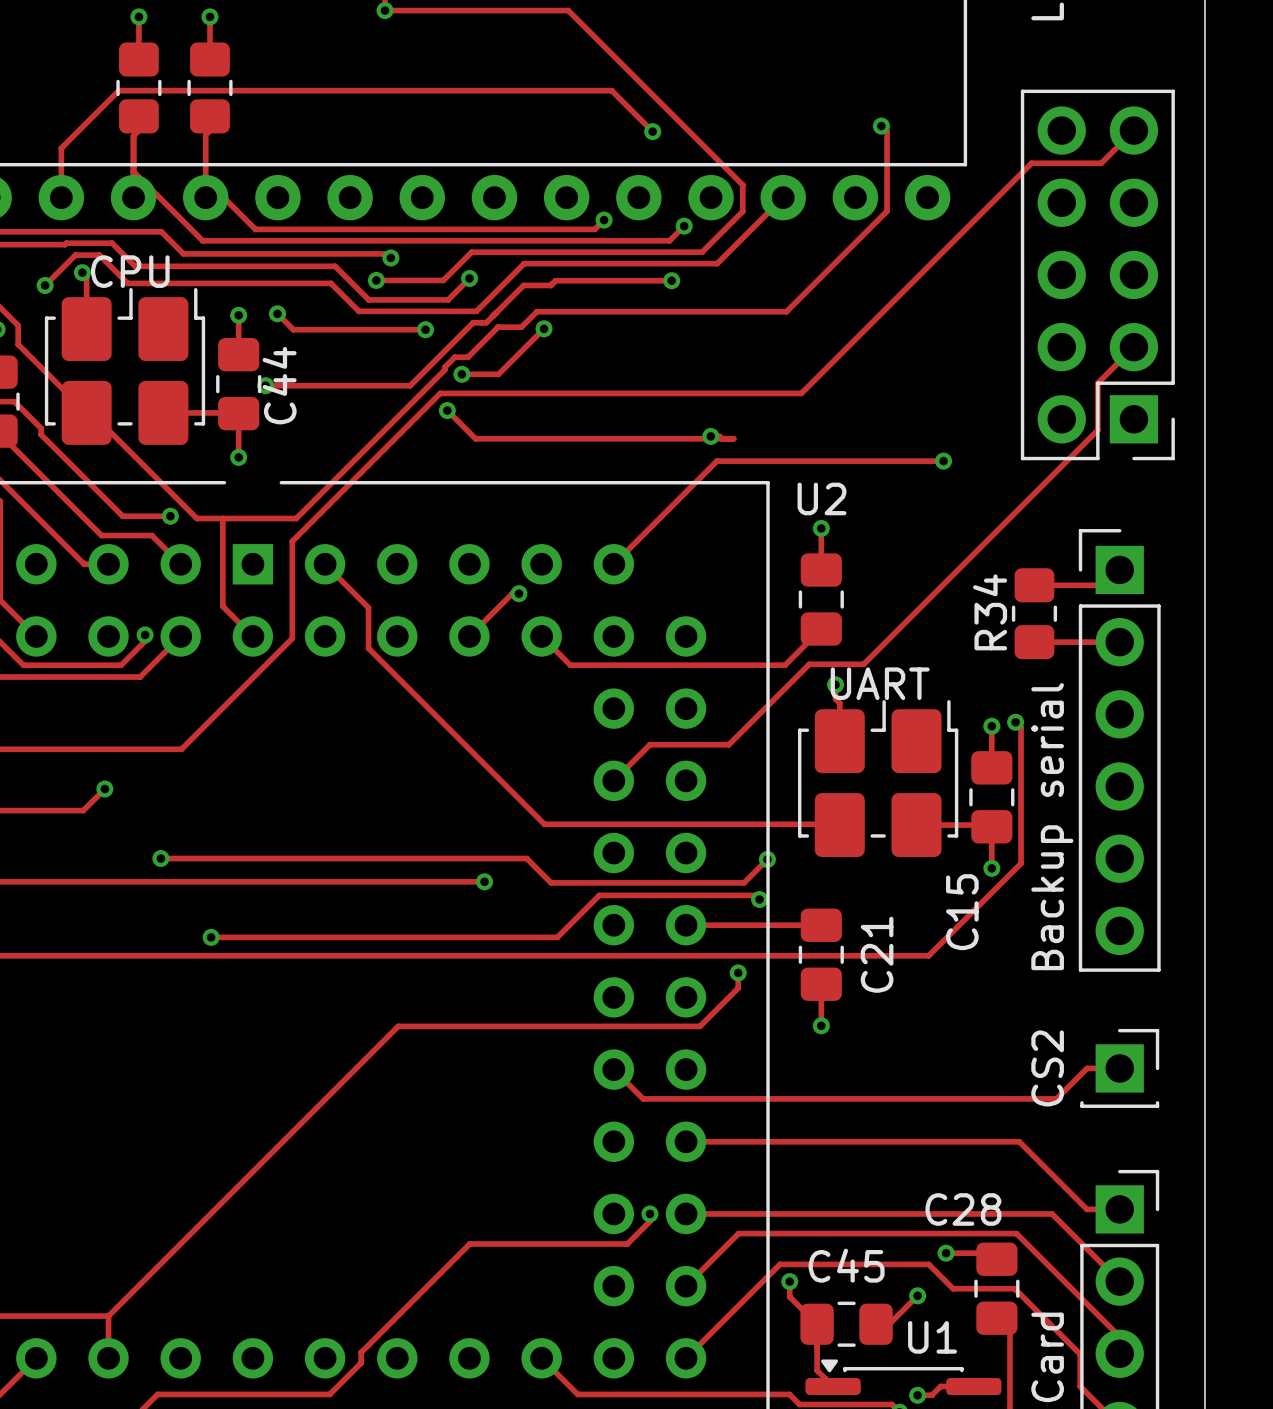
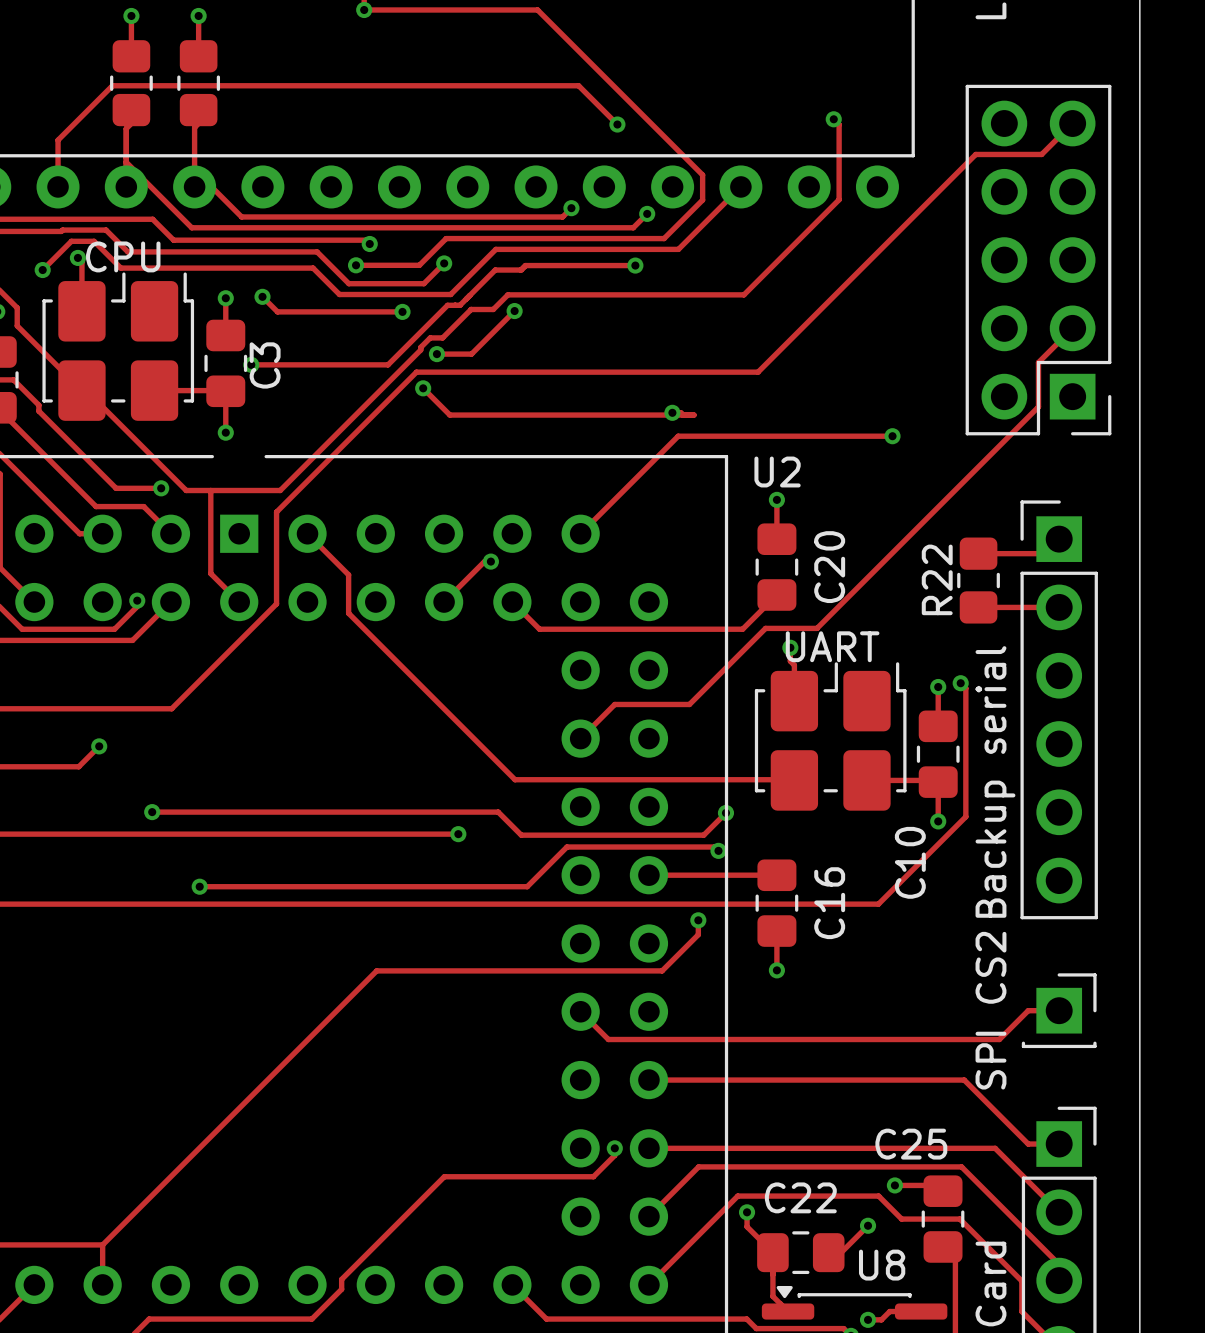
C44 name: C44 (279, 385) -> C3 (265, 365)
text: none -> C20 (829, 567)
R34 name: R34 (990, 612) -> R22 (937, 579)
C15 name: C15 (962, 912) -> C10 (910, 862)
C21 name: C21 (877, 954) -> C16 (829, 903)
part value: CS2 (1047, 1068) -> SPI CS2 (990, 1010)
C28 name: C28 (963, 1209) -> C25 (911, 1144)
C45 name: C45 (846, 1265) -> C22 (800, 1197)
U1 name: U1 (932, 1337) -> U8 (882, 1265)

